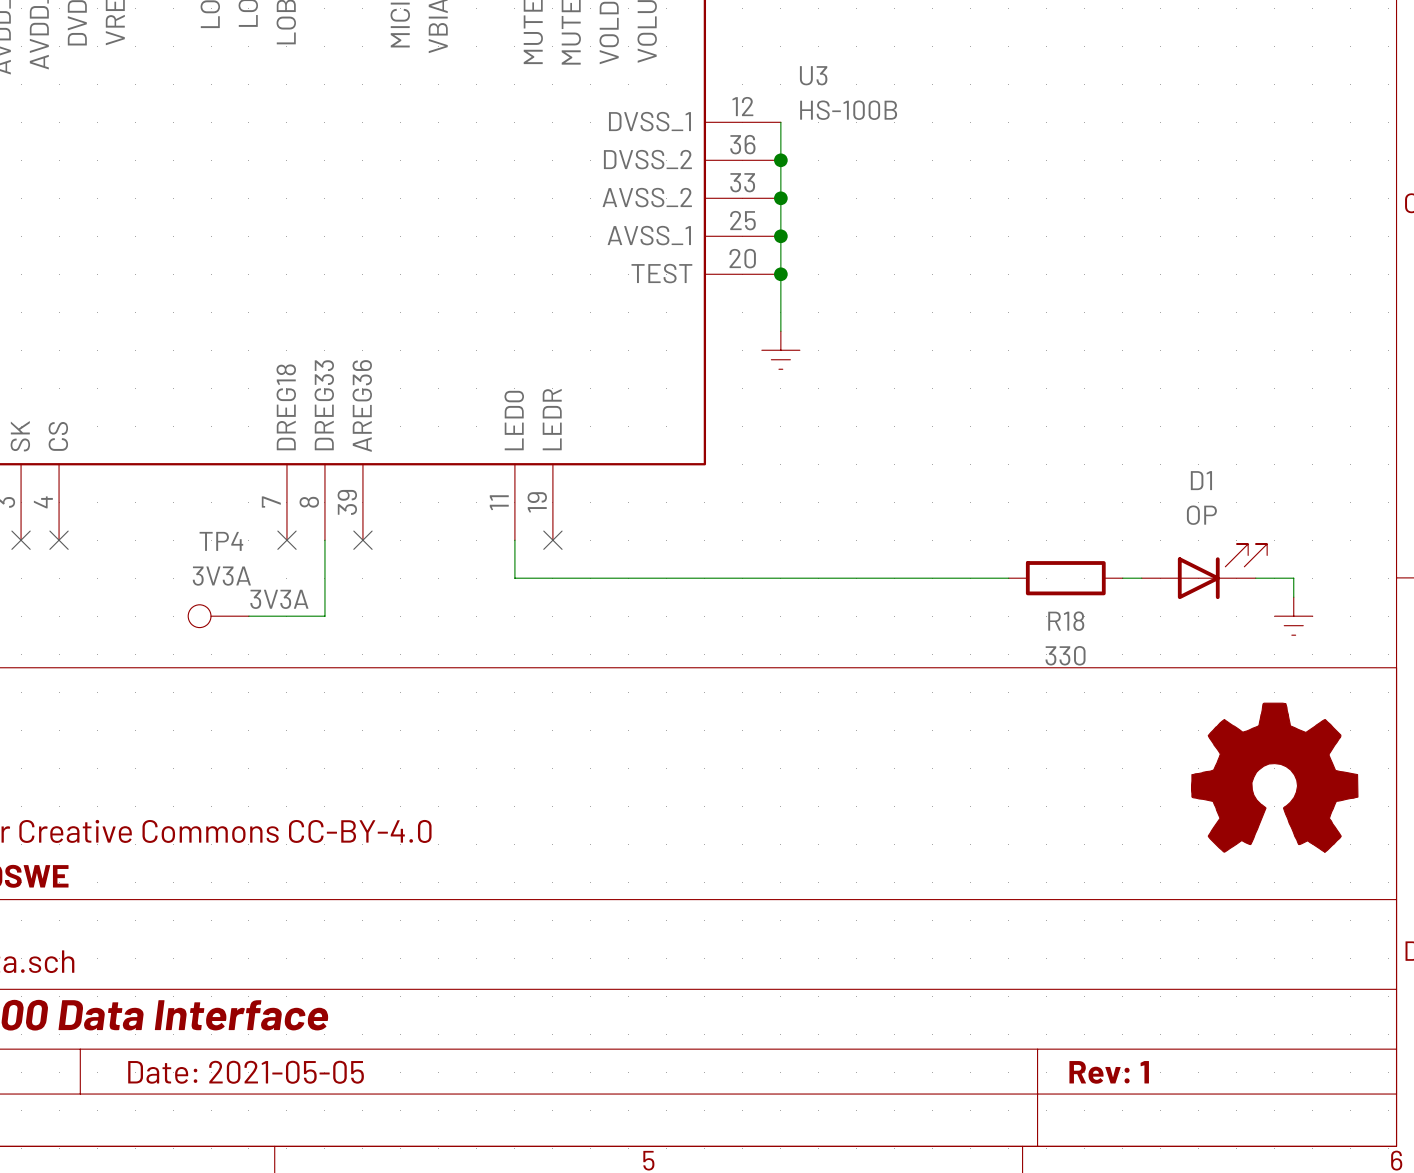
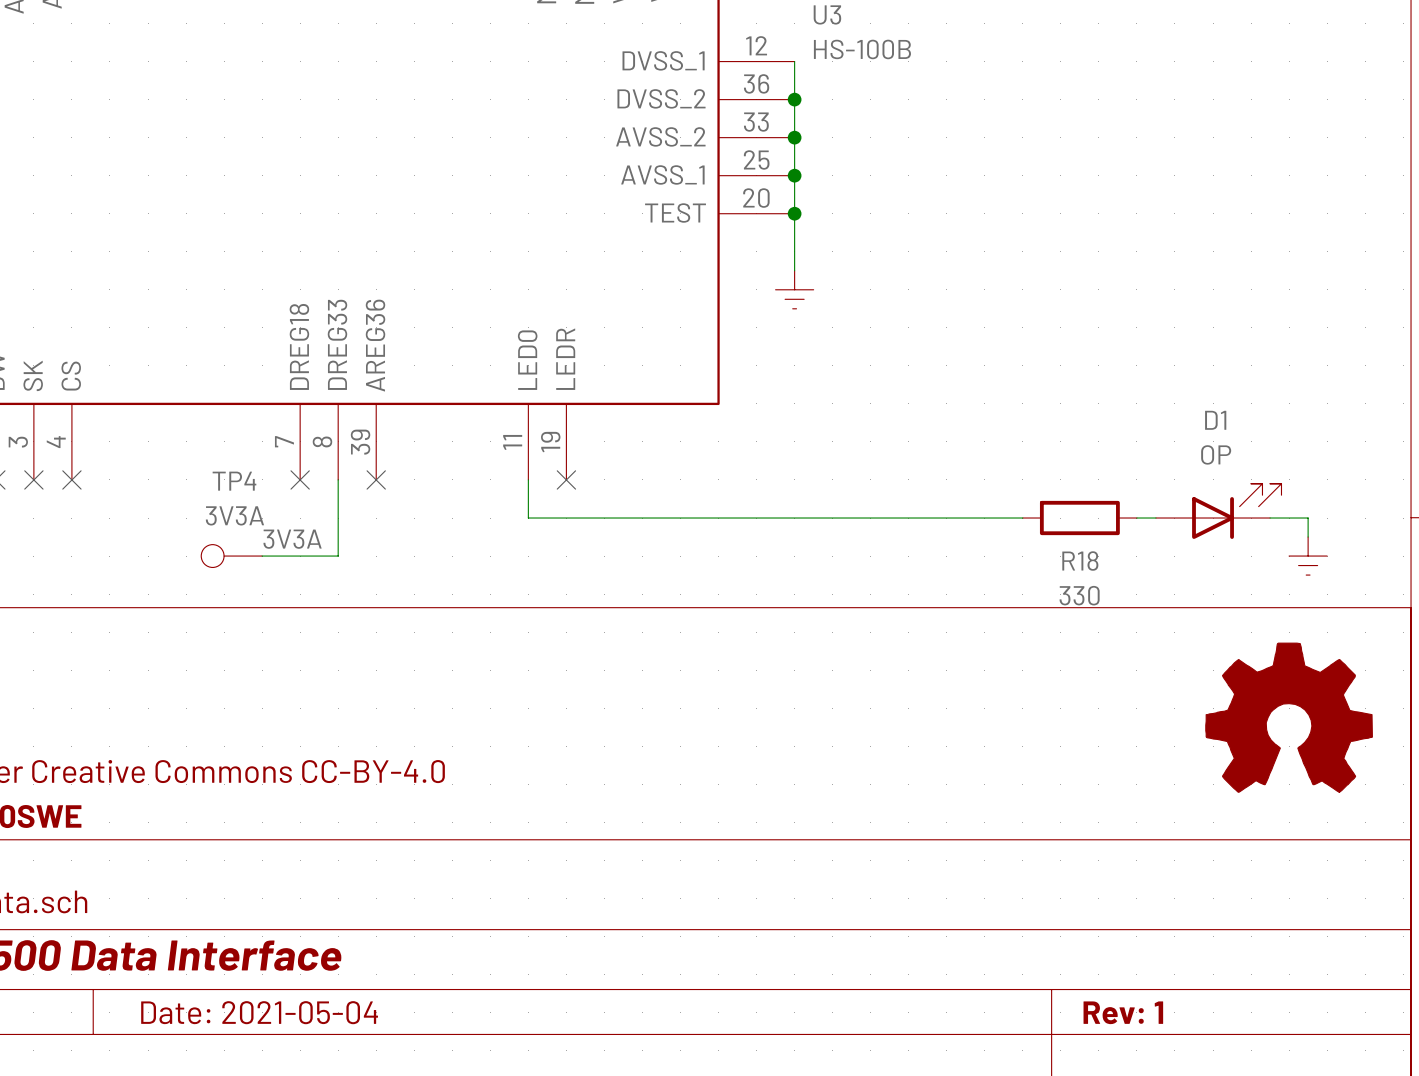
title block: Date: 2021-05-05 (246, 1072) -> Date: 2021-05-04 (259, 1012)

